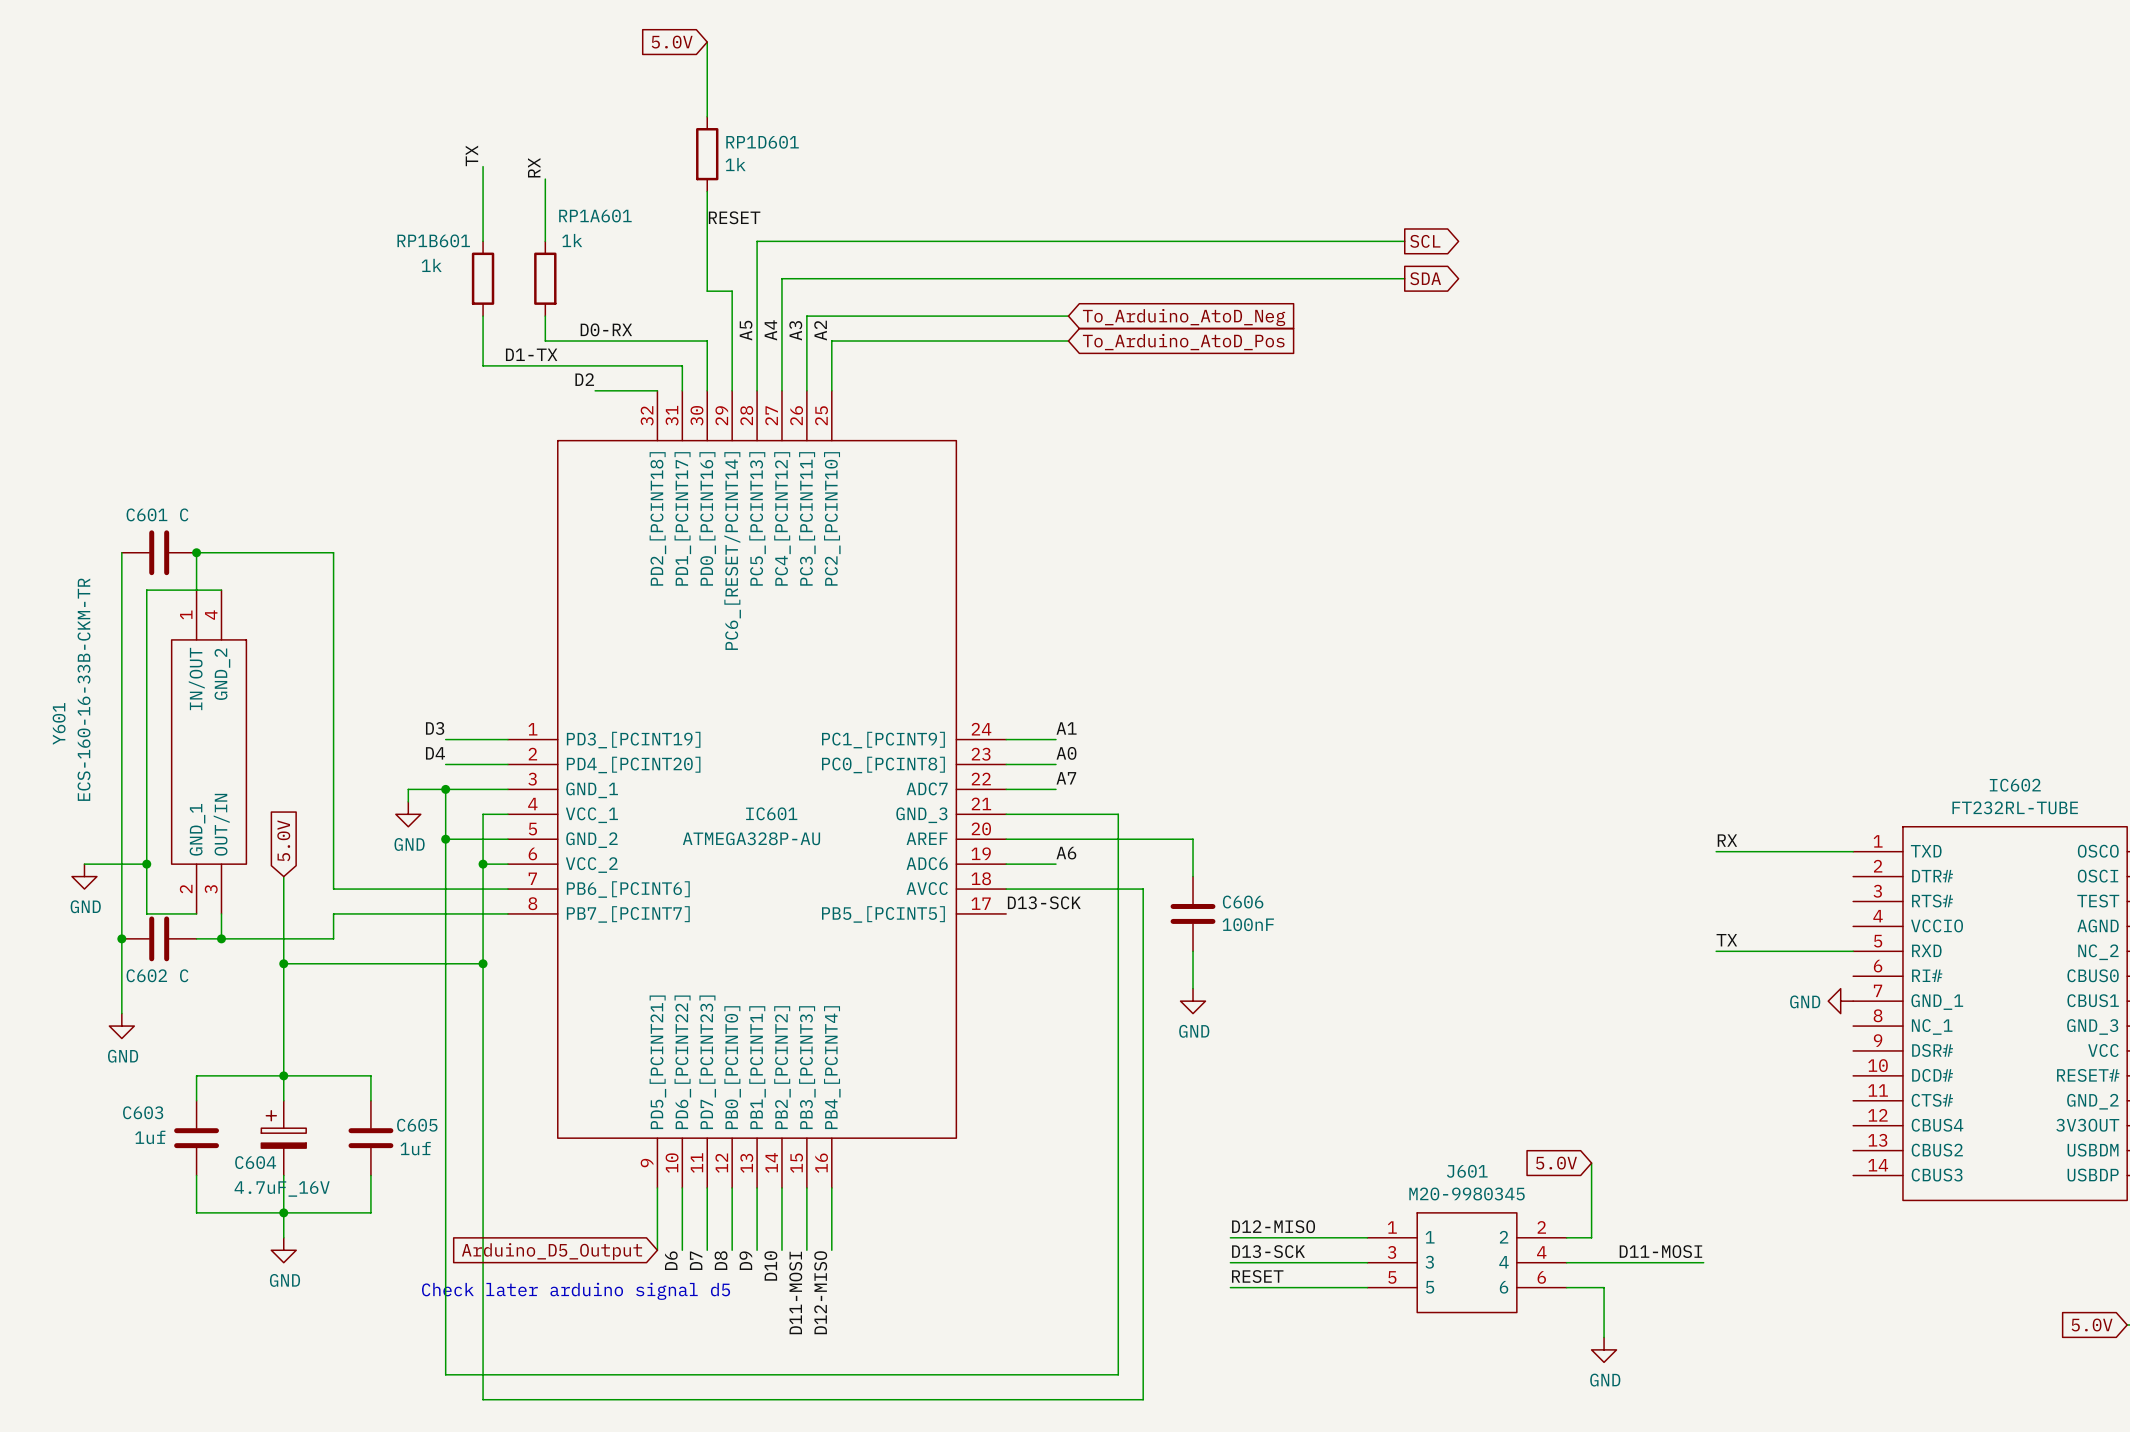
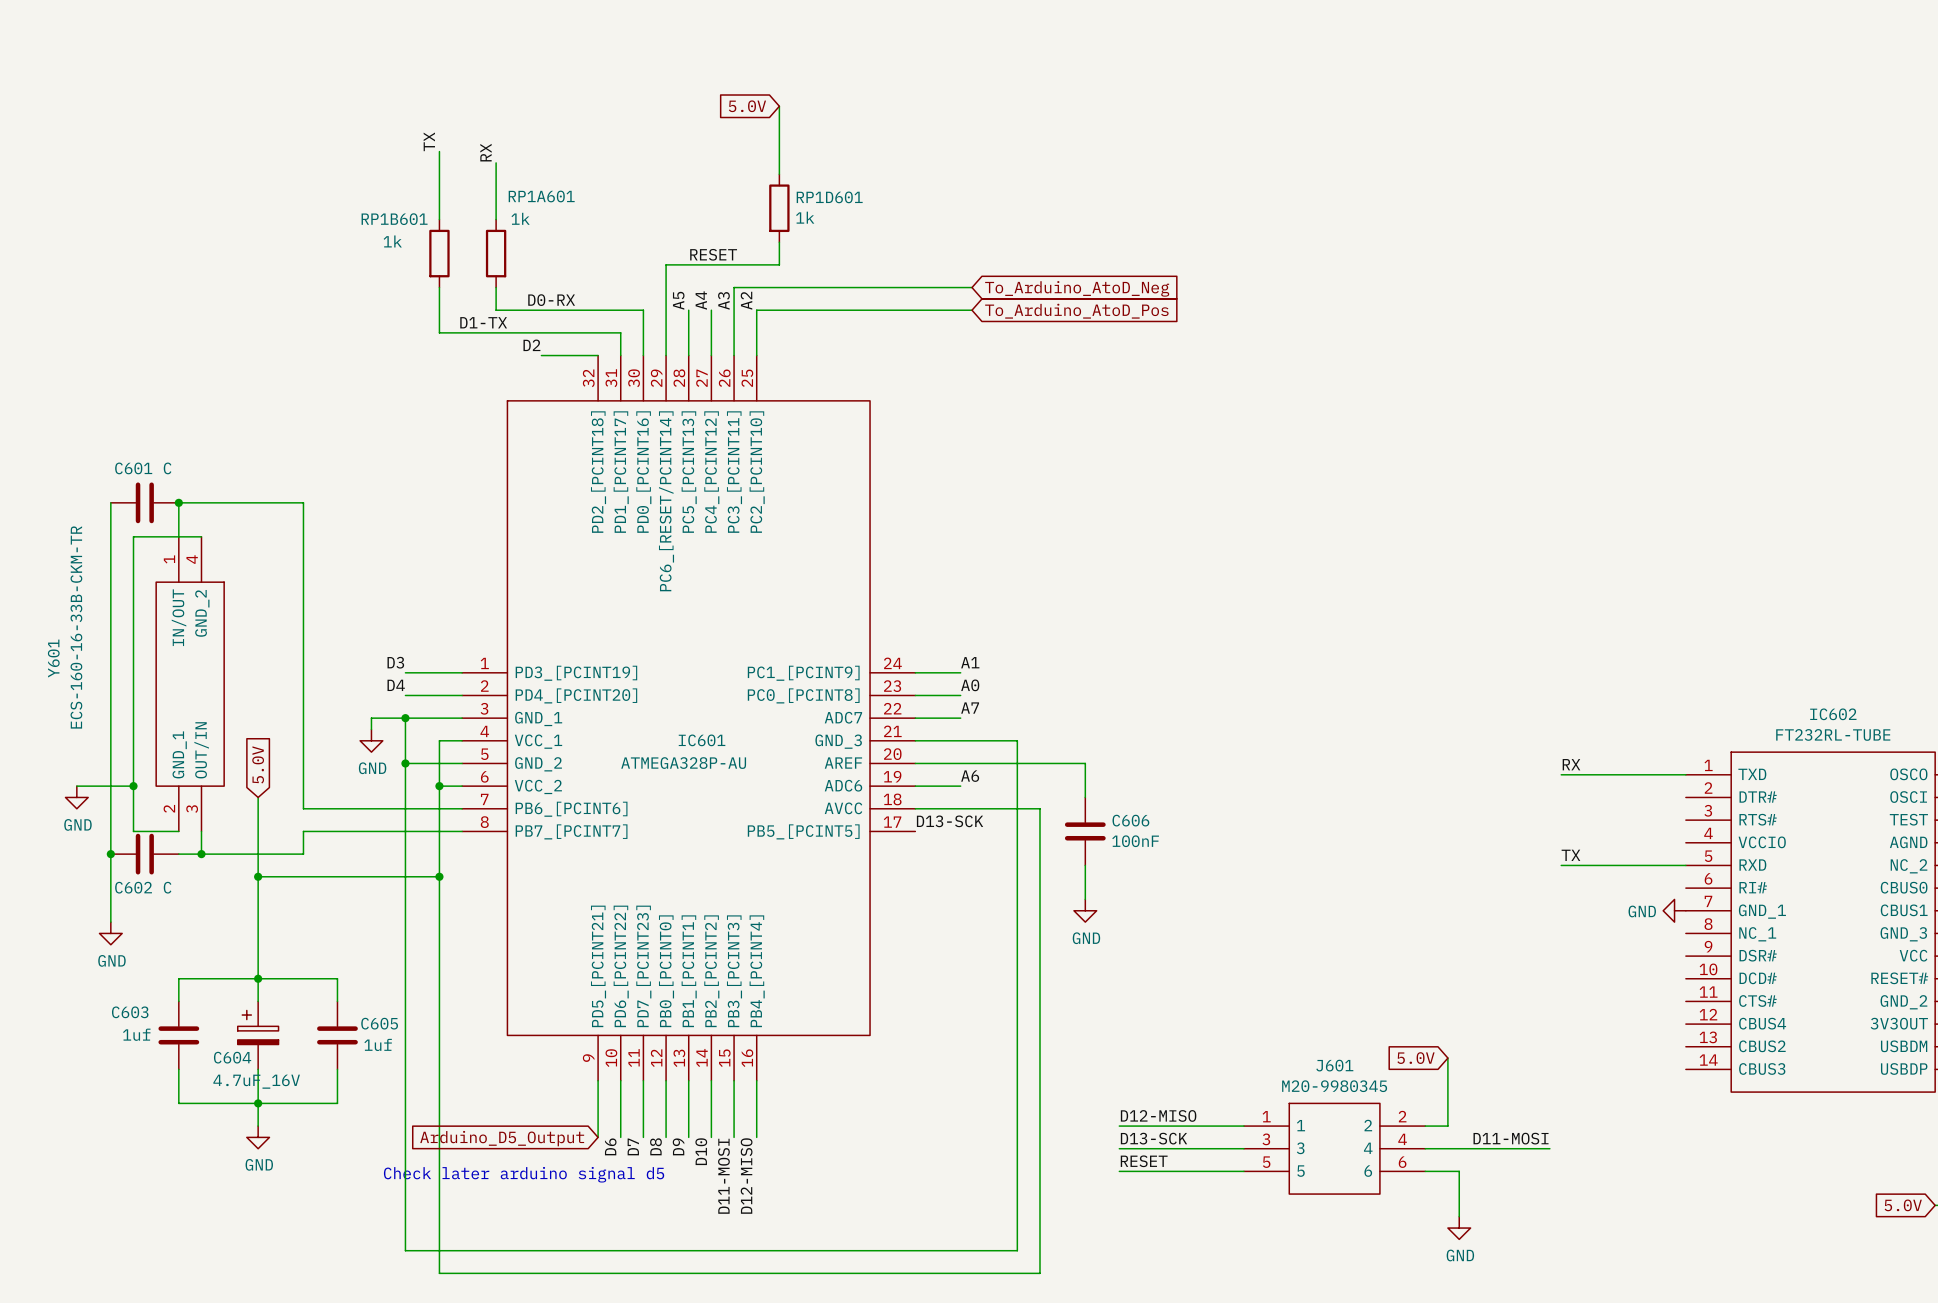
global label position: 5.0V (672, 42) -> 5.0V (747, 106)
wire: (707, 42) (707, 116) -> (779, 106) (779, 174)
RP1D601 position: (707, 154) -> (779, 208)
wire: (707, 191) (707, 291) (732, 291) -> (779, 242) (779, 264) (666, 264)
label position: RESET (734, 217) -> RESET (713, 254)
wire: (1404, 241) (757, 241) (757, 341) -> none
global label: SCL (1425, 241) -> none
wire: (1404, 278) (781, 278) (781, 341) -> none
global label: SDA (1425, 278) -> none

